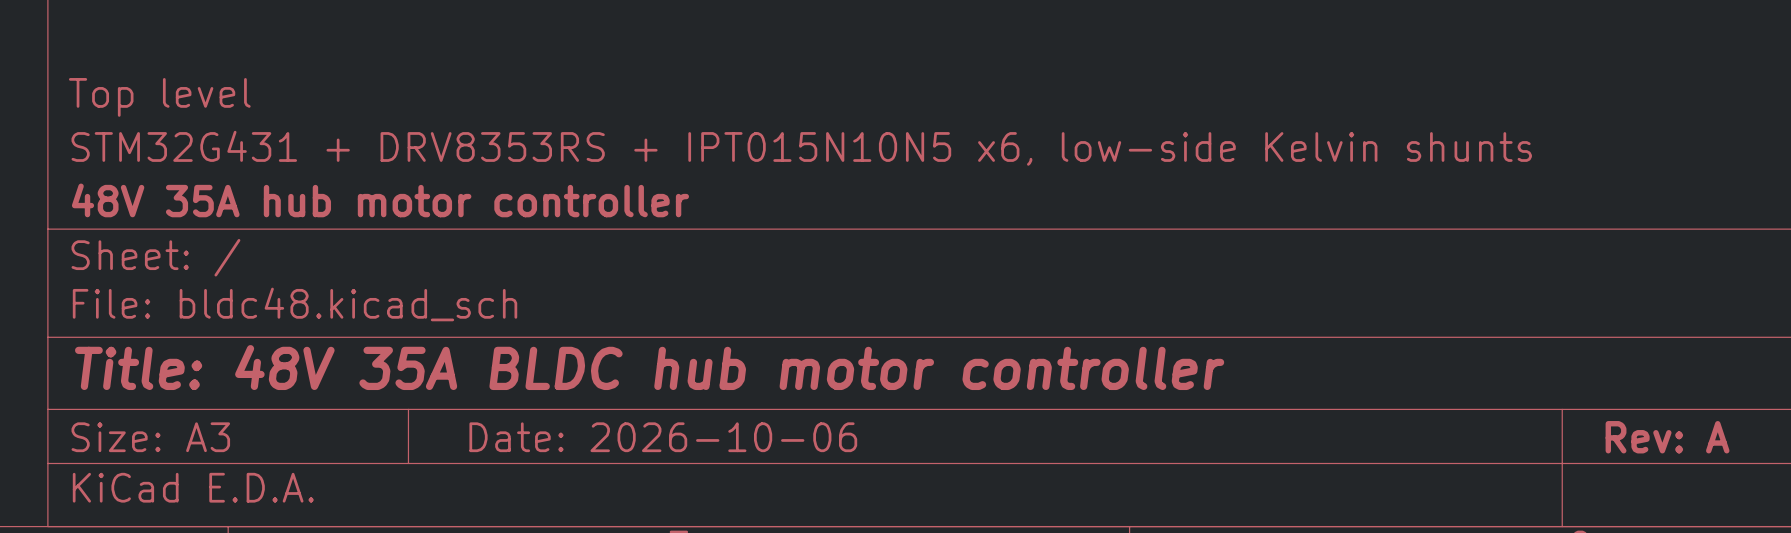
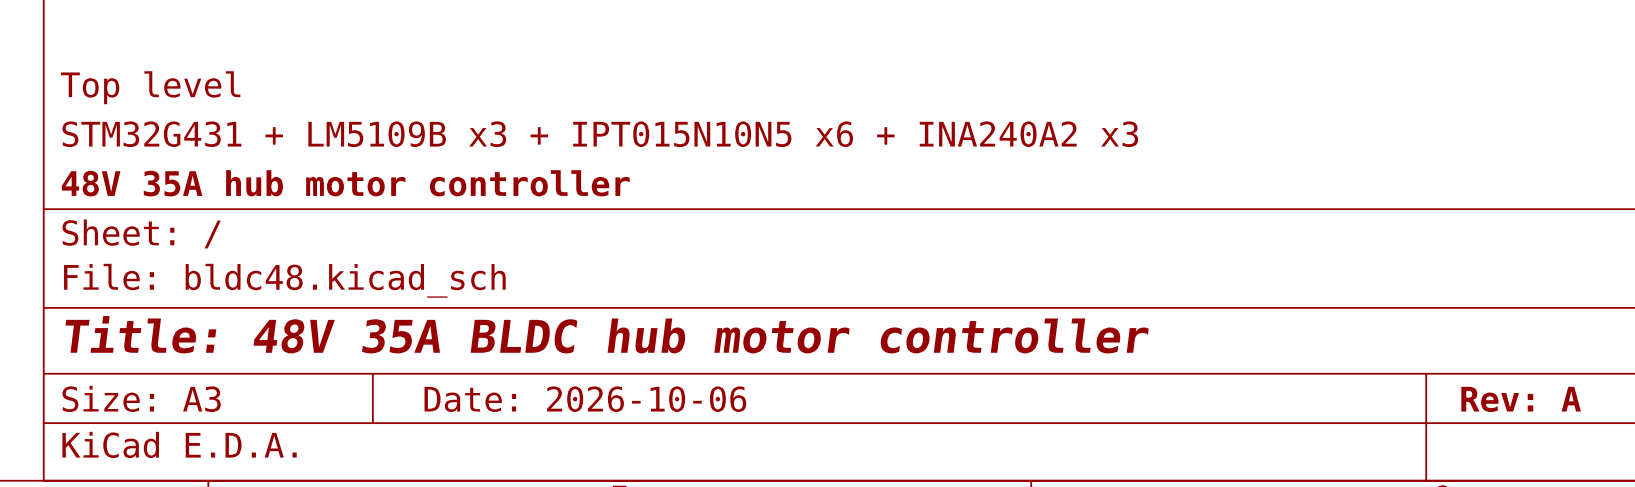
title block: STM32G431 + DRV8353RS + IPT015N10N5 x6, low-side Kelvin shunts (801, 148) -> STM32G431 + LM5109B x3 + IPT015N10N5 x6 + INA240A2 x3 (600, 134)

